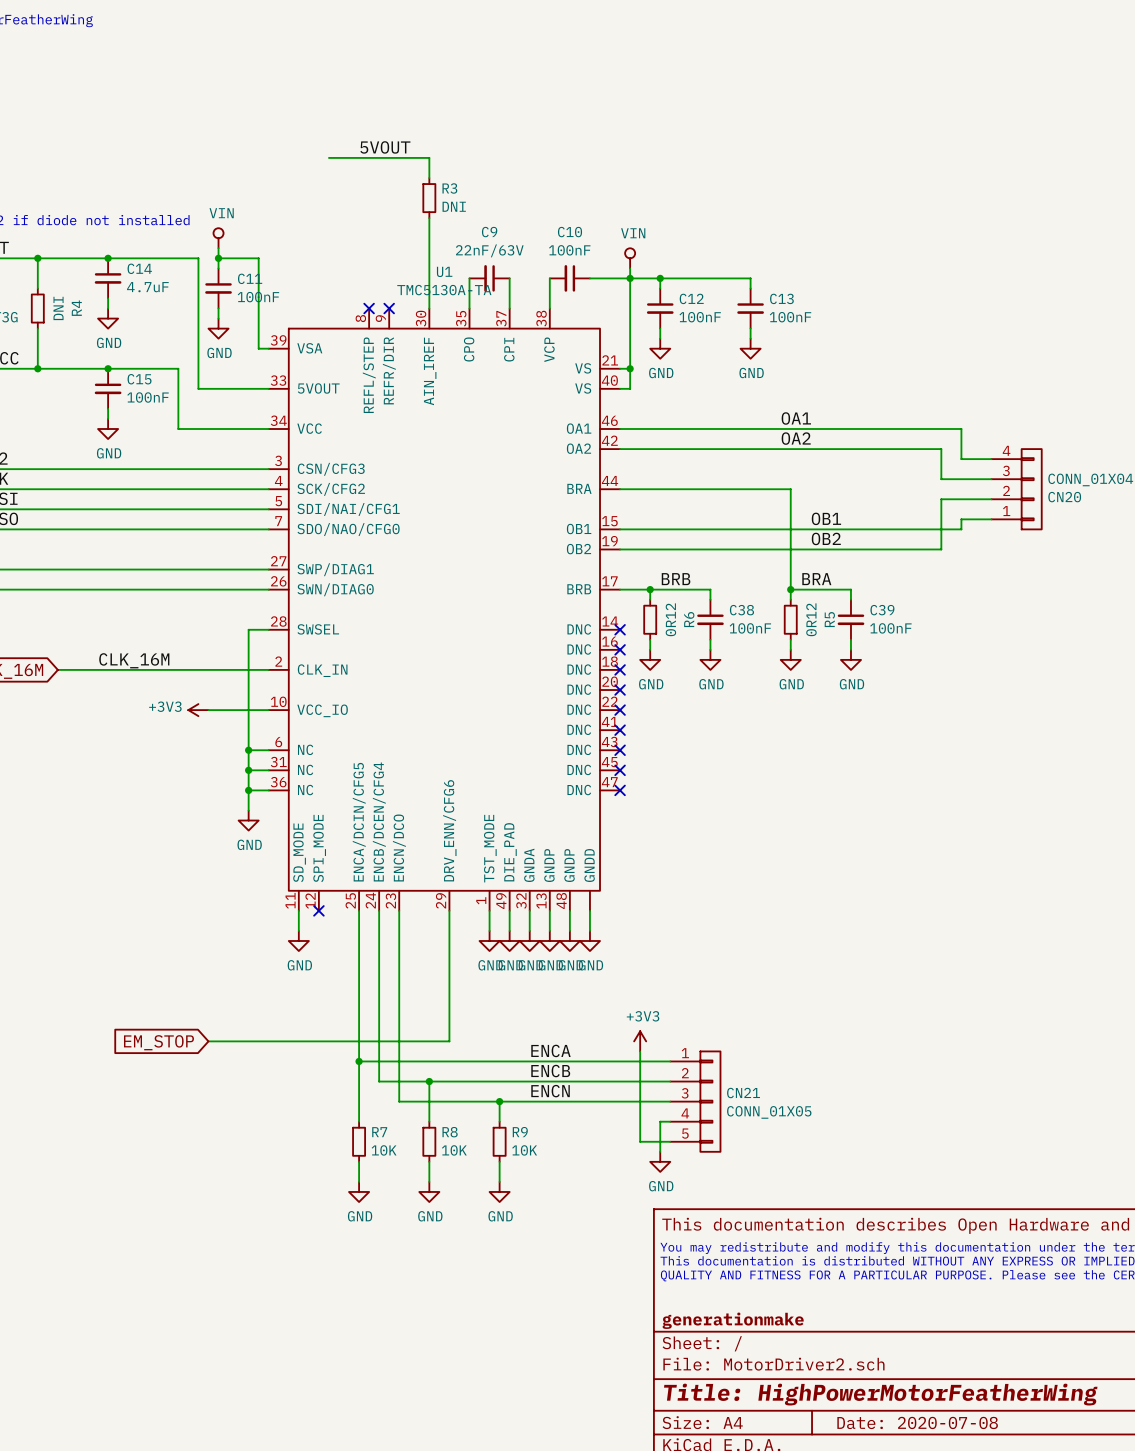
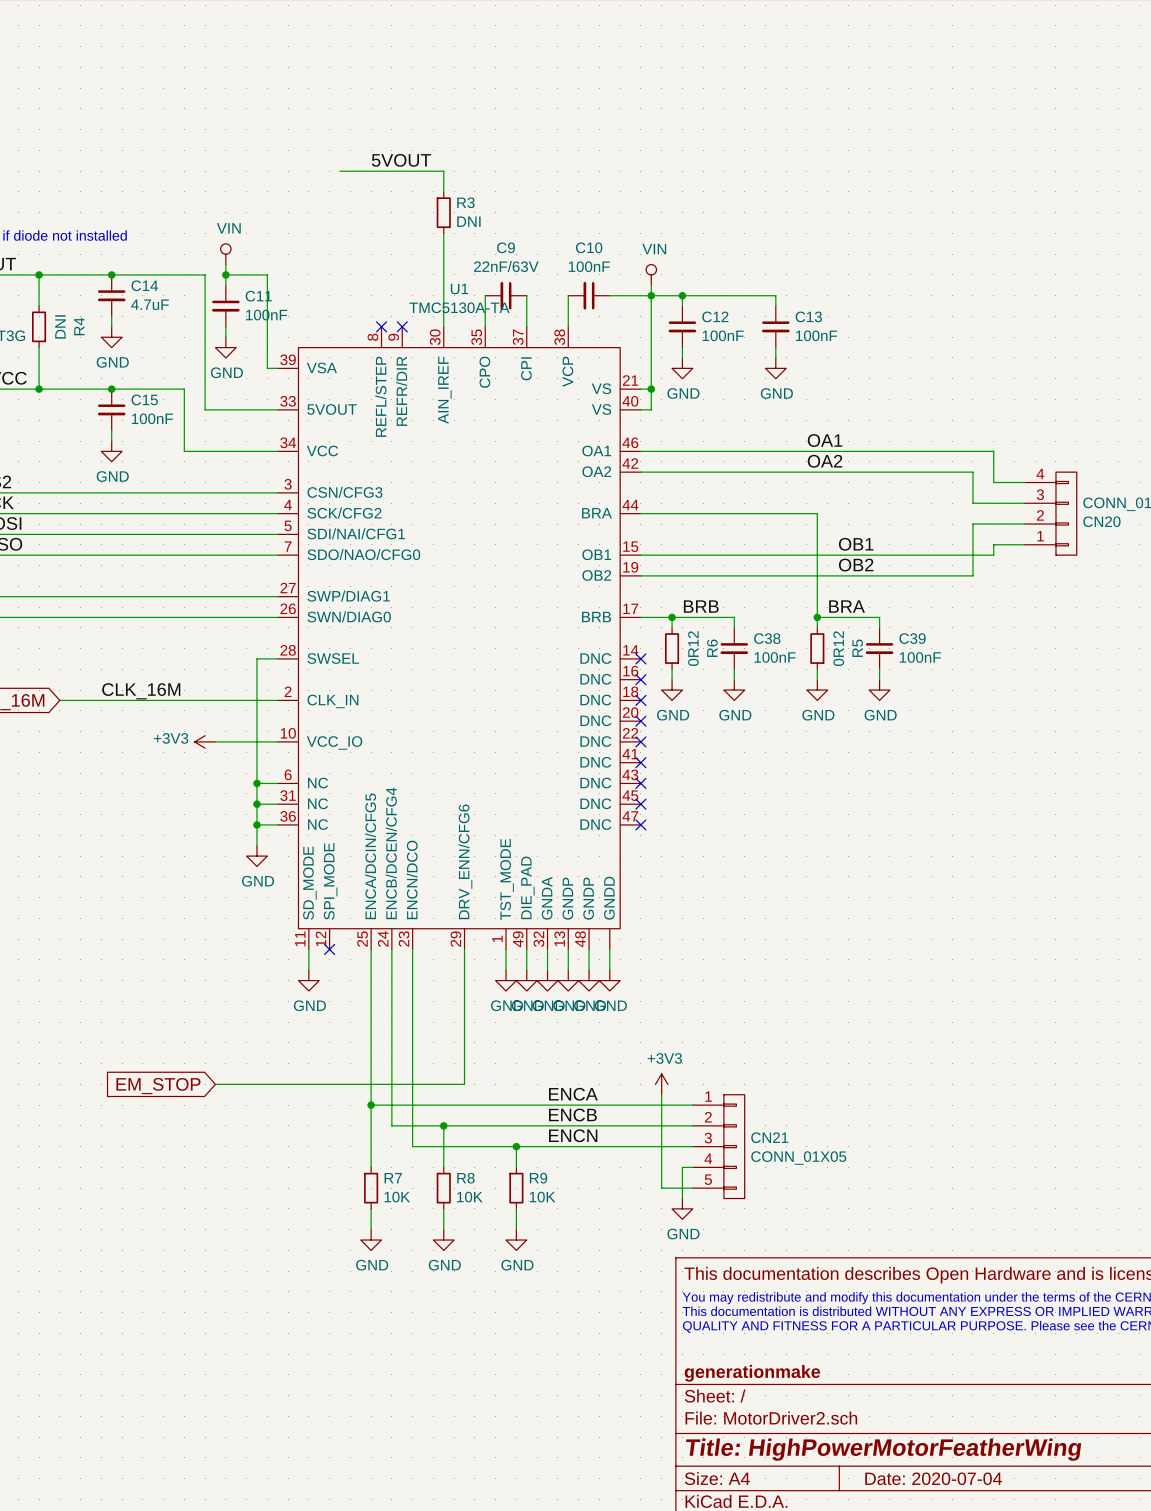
title block: Date: 2020-07-08 (917, 1422) -> Date: 2020-07-04 (933, 1478)

